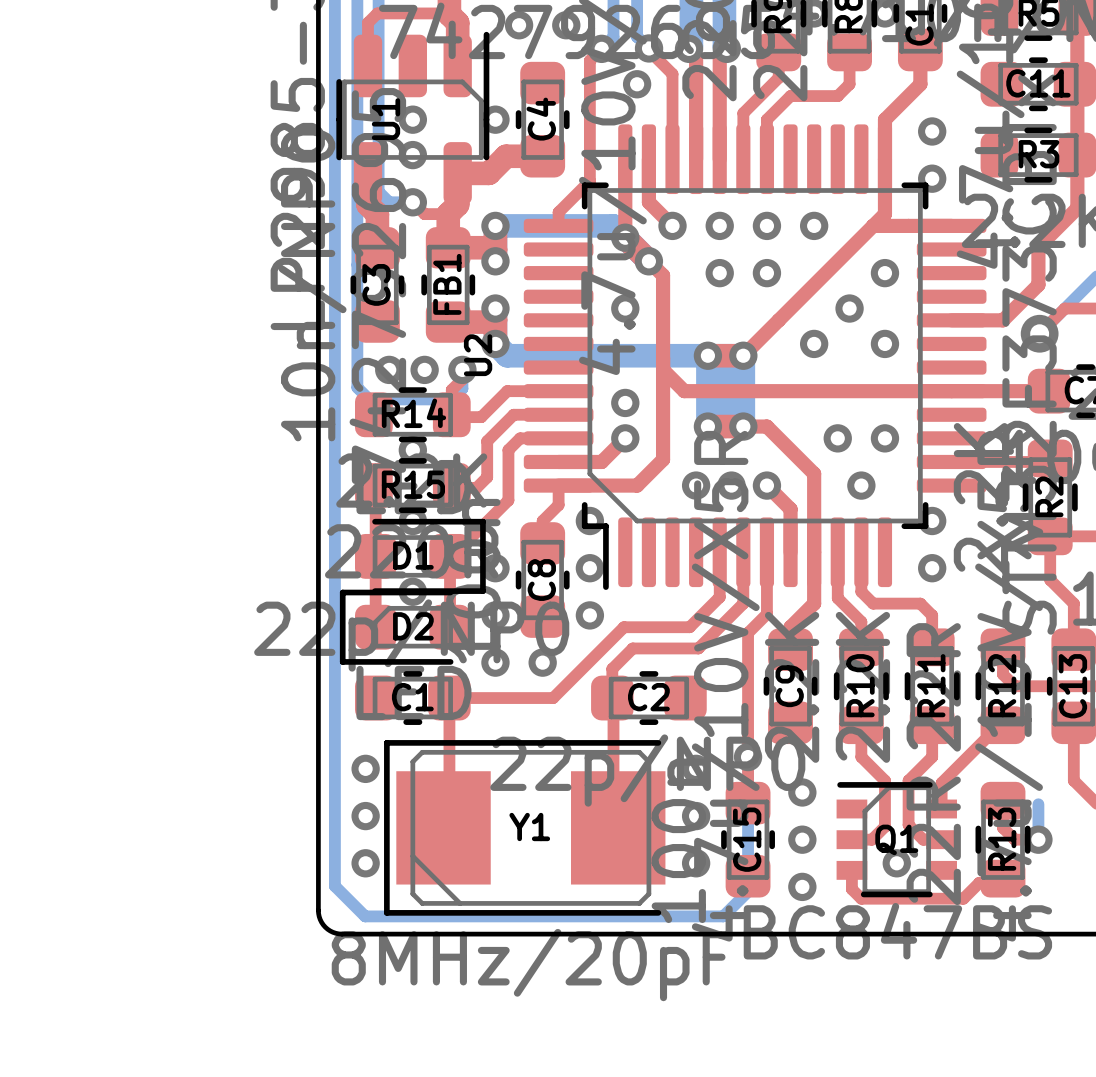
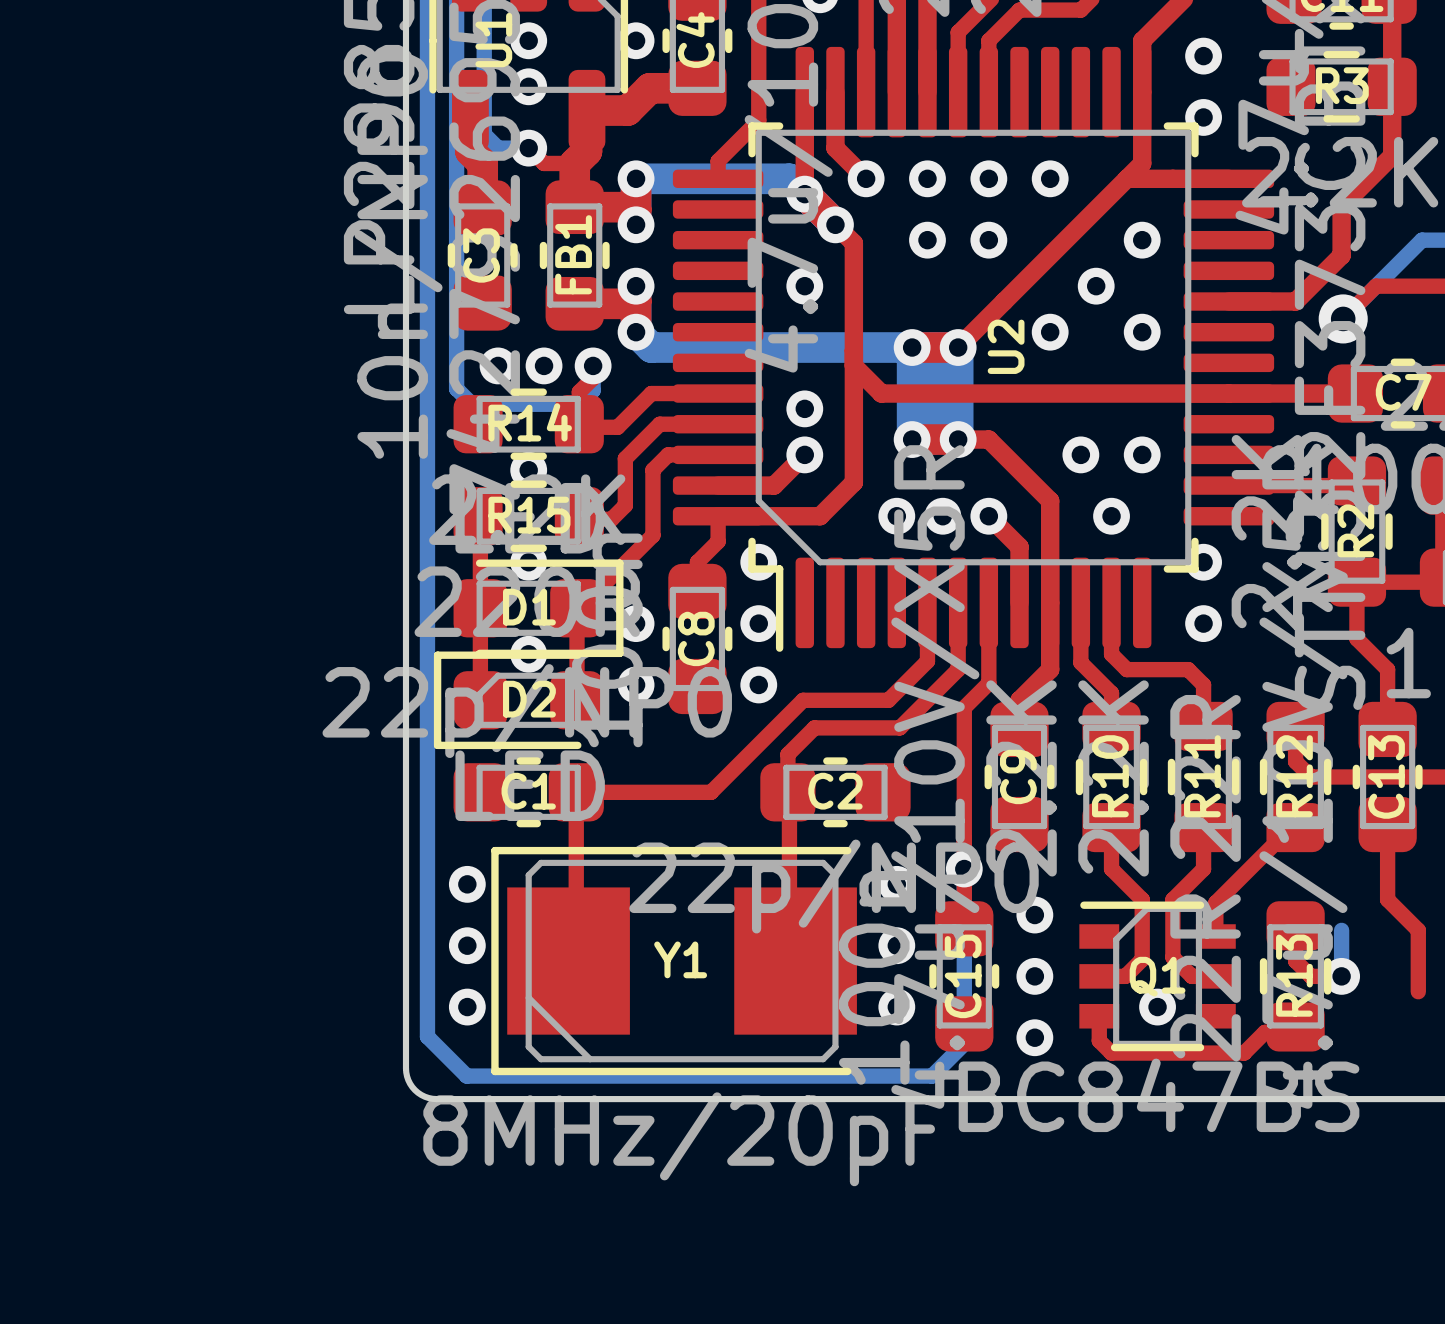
U2 name position: U2 (478, 355) -> U2 (1006, 346)
via: (495, 662) -> none
via: (542, 662) -> none

